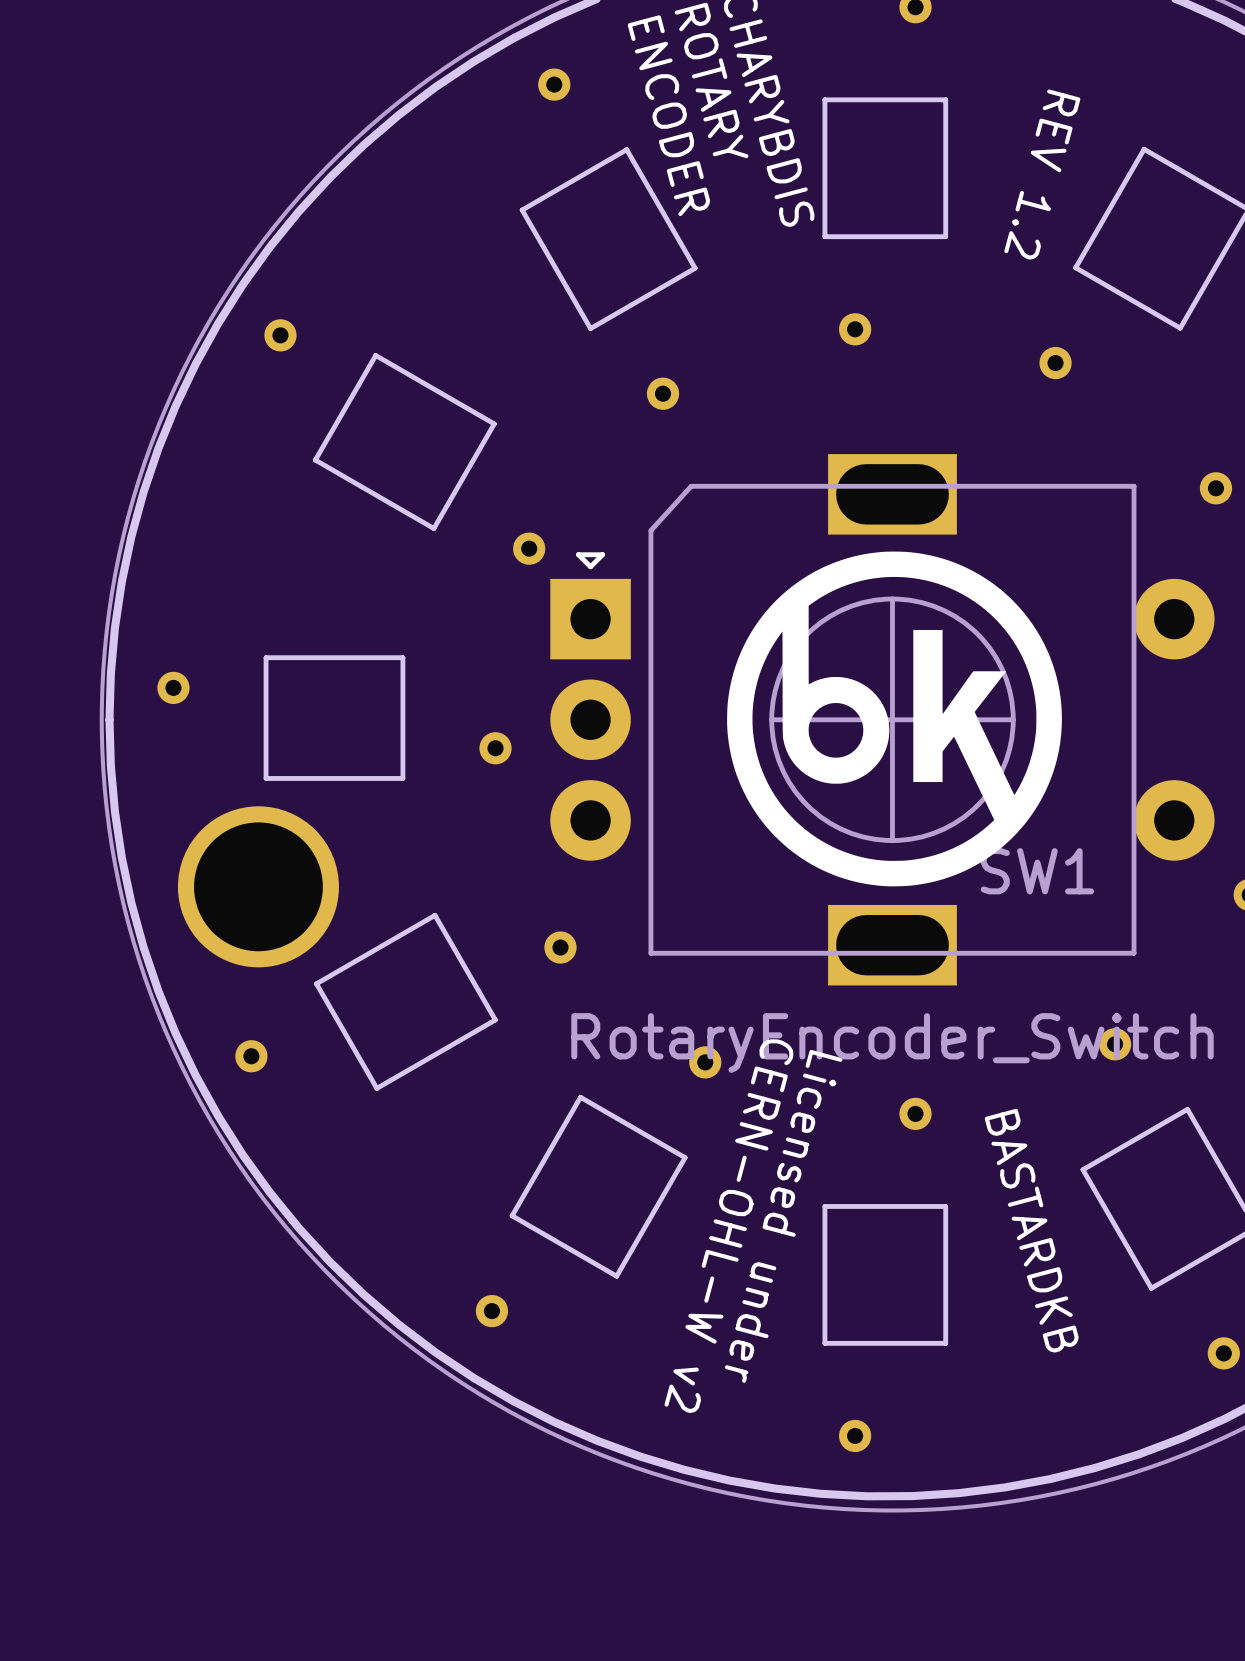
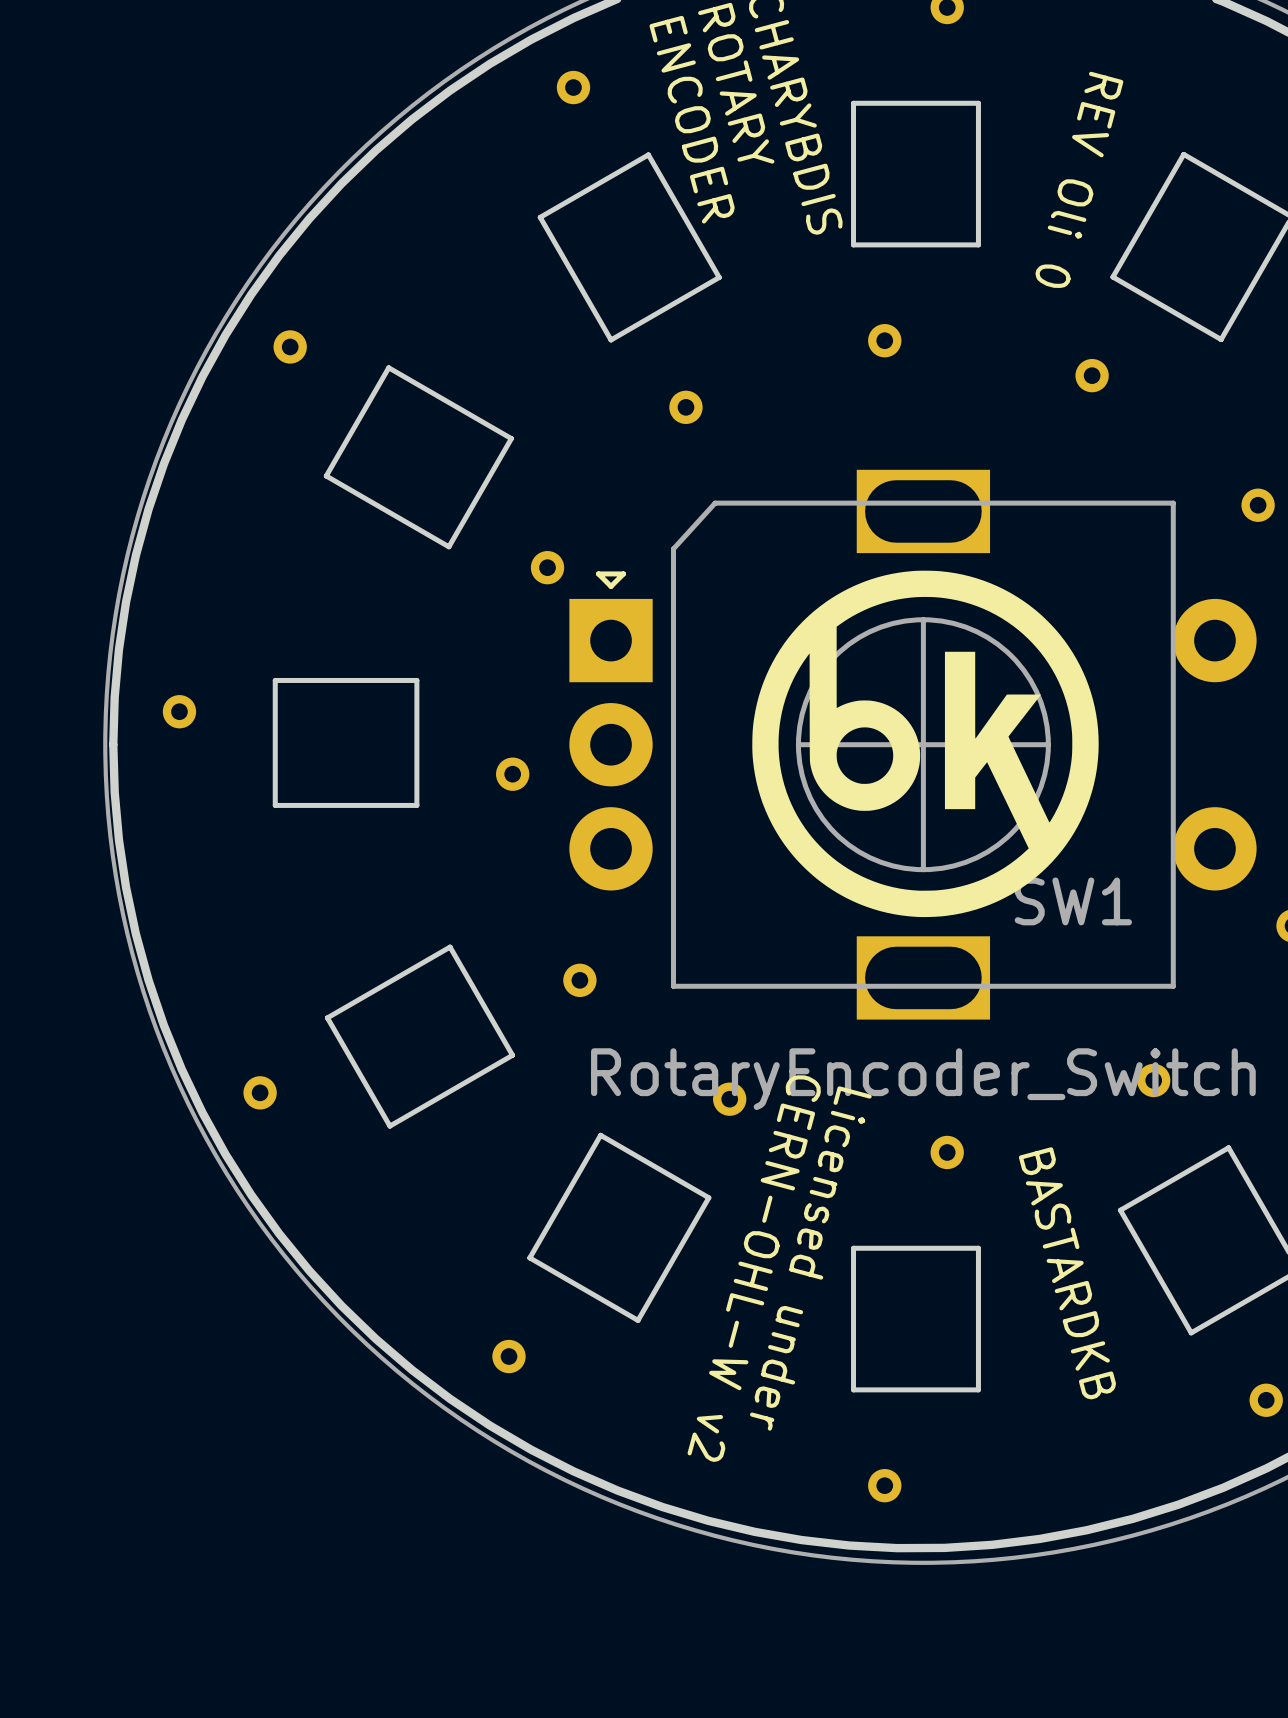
text: REV 1.2 (1042, 174) -> REV Oli 0 (1079, 179)
part: (258, 886) -> none

